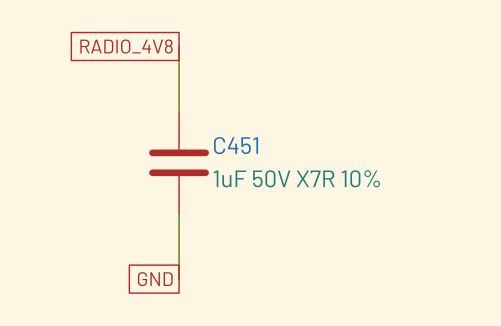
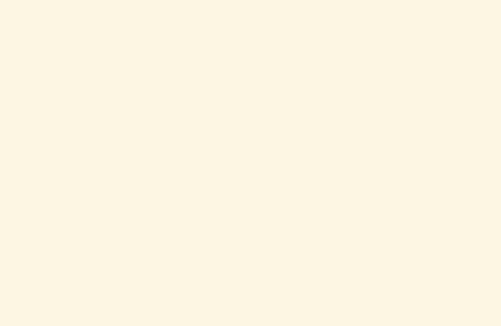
global label: RADIO_4V8 (126, 46) -> none
wire: (179, 46) (179, 112) -> none
C451: 1uF 50V X7R 10% (179, 162) -> none
wire: (179, 212) (179, 279) -> none
global label: GND (155, 279) -> none

